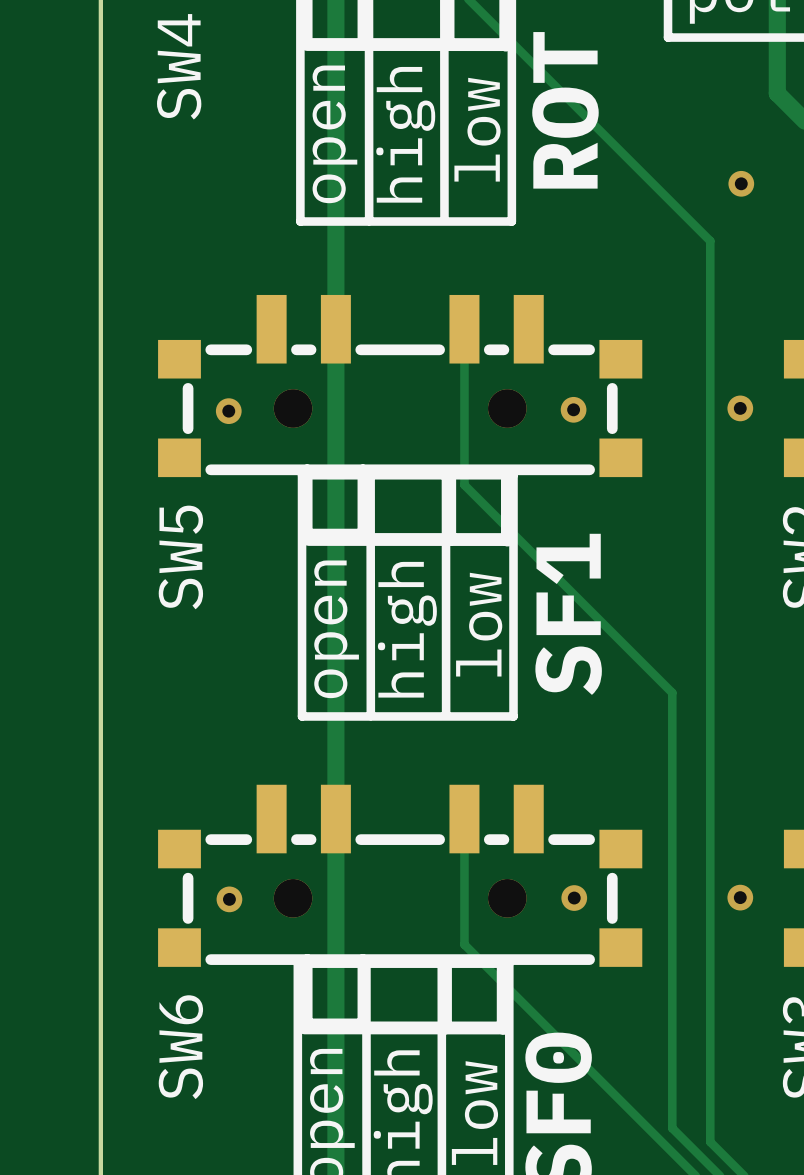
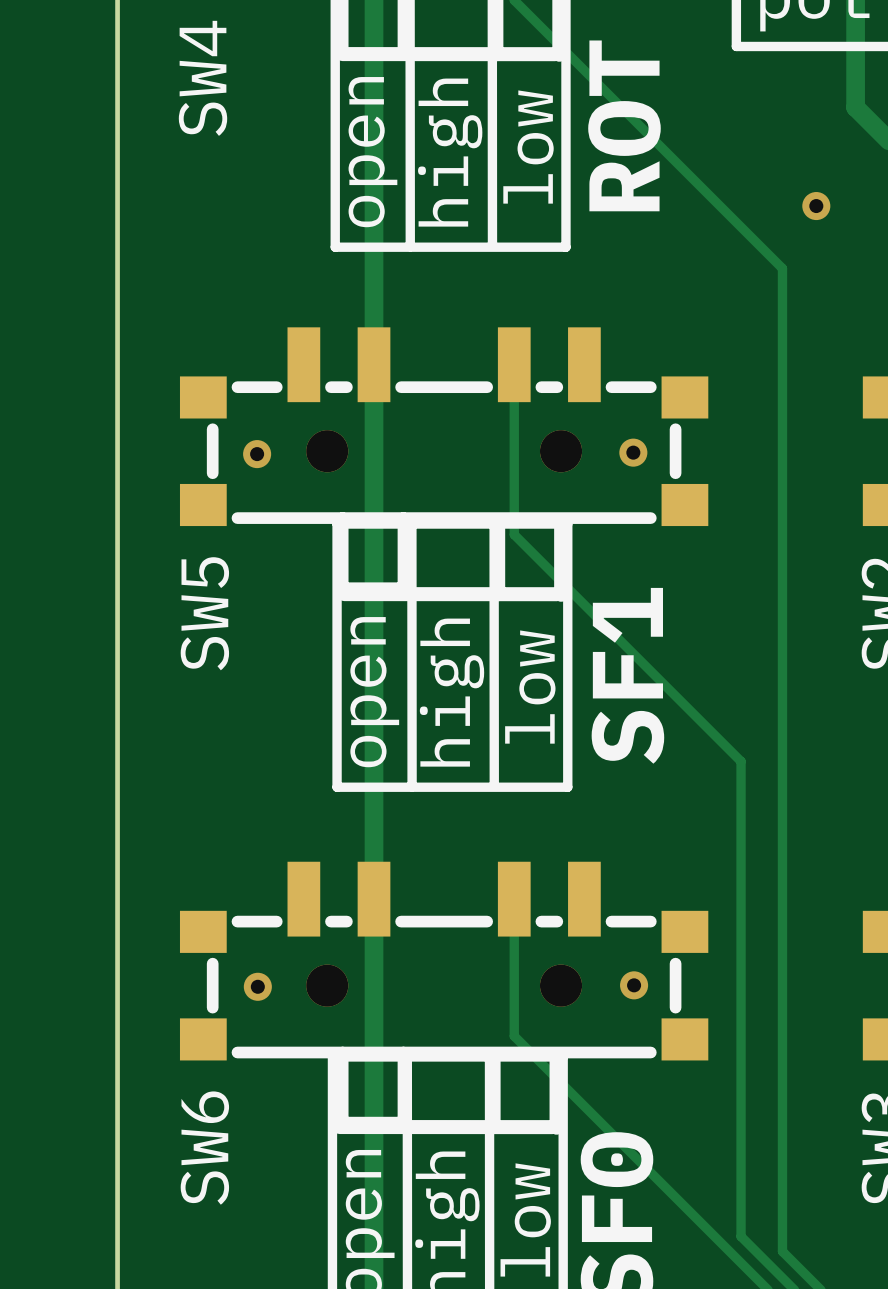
via: (740, 408) -> none
via: (740, 897) -> none

